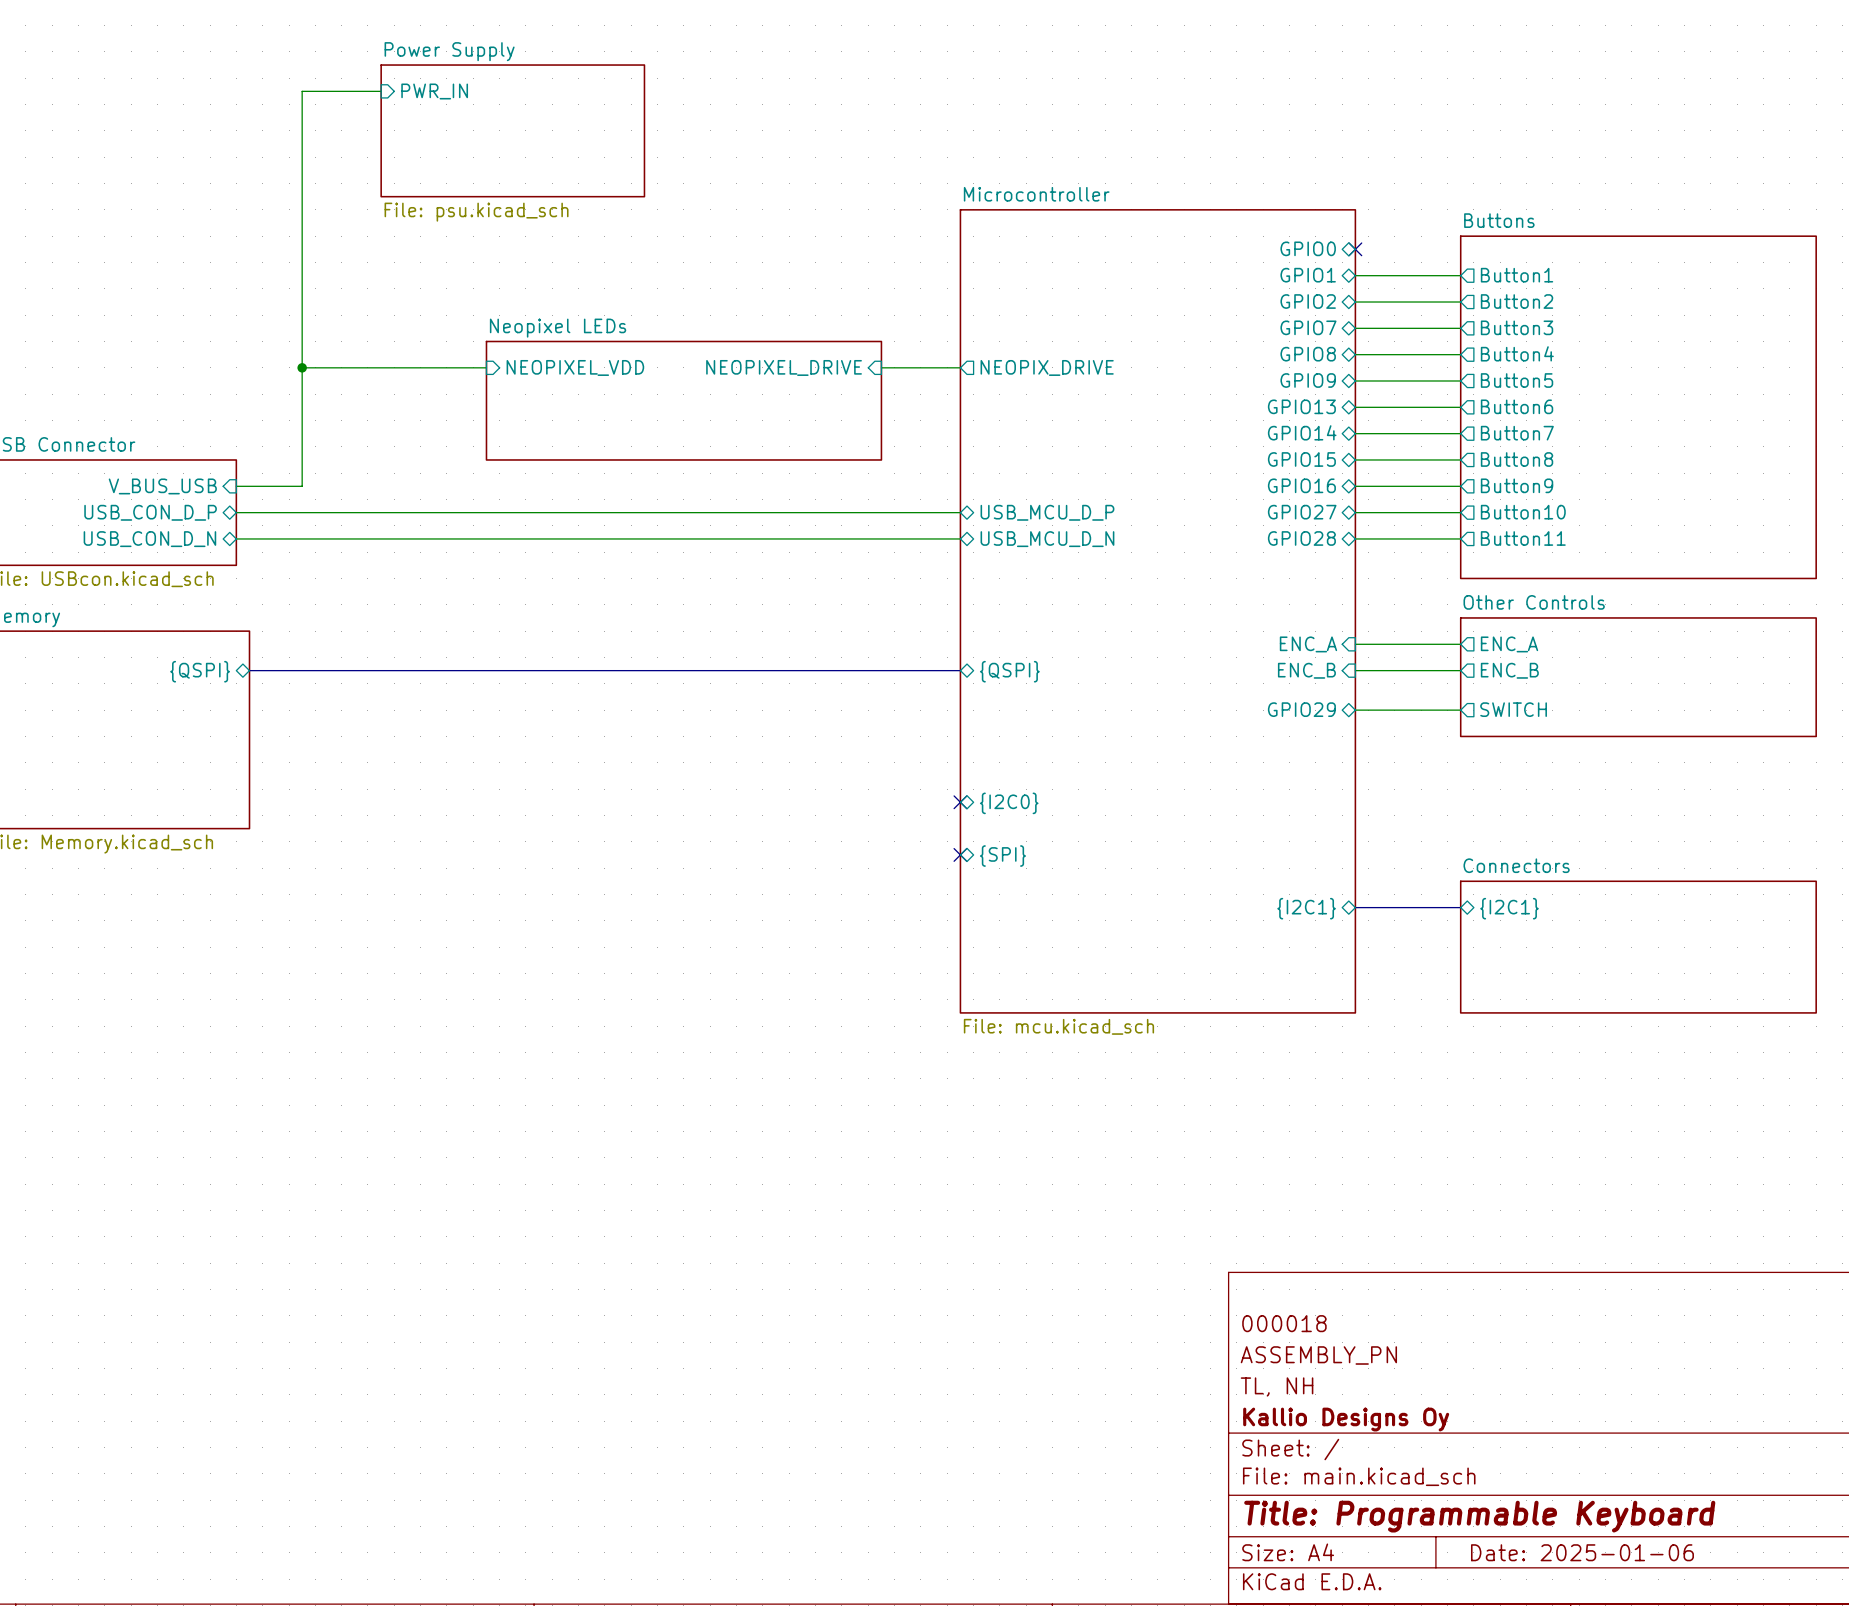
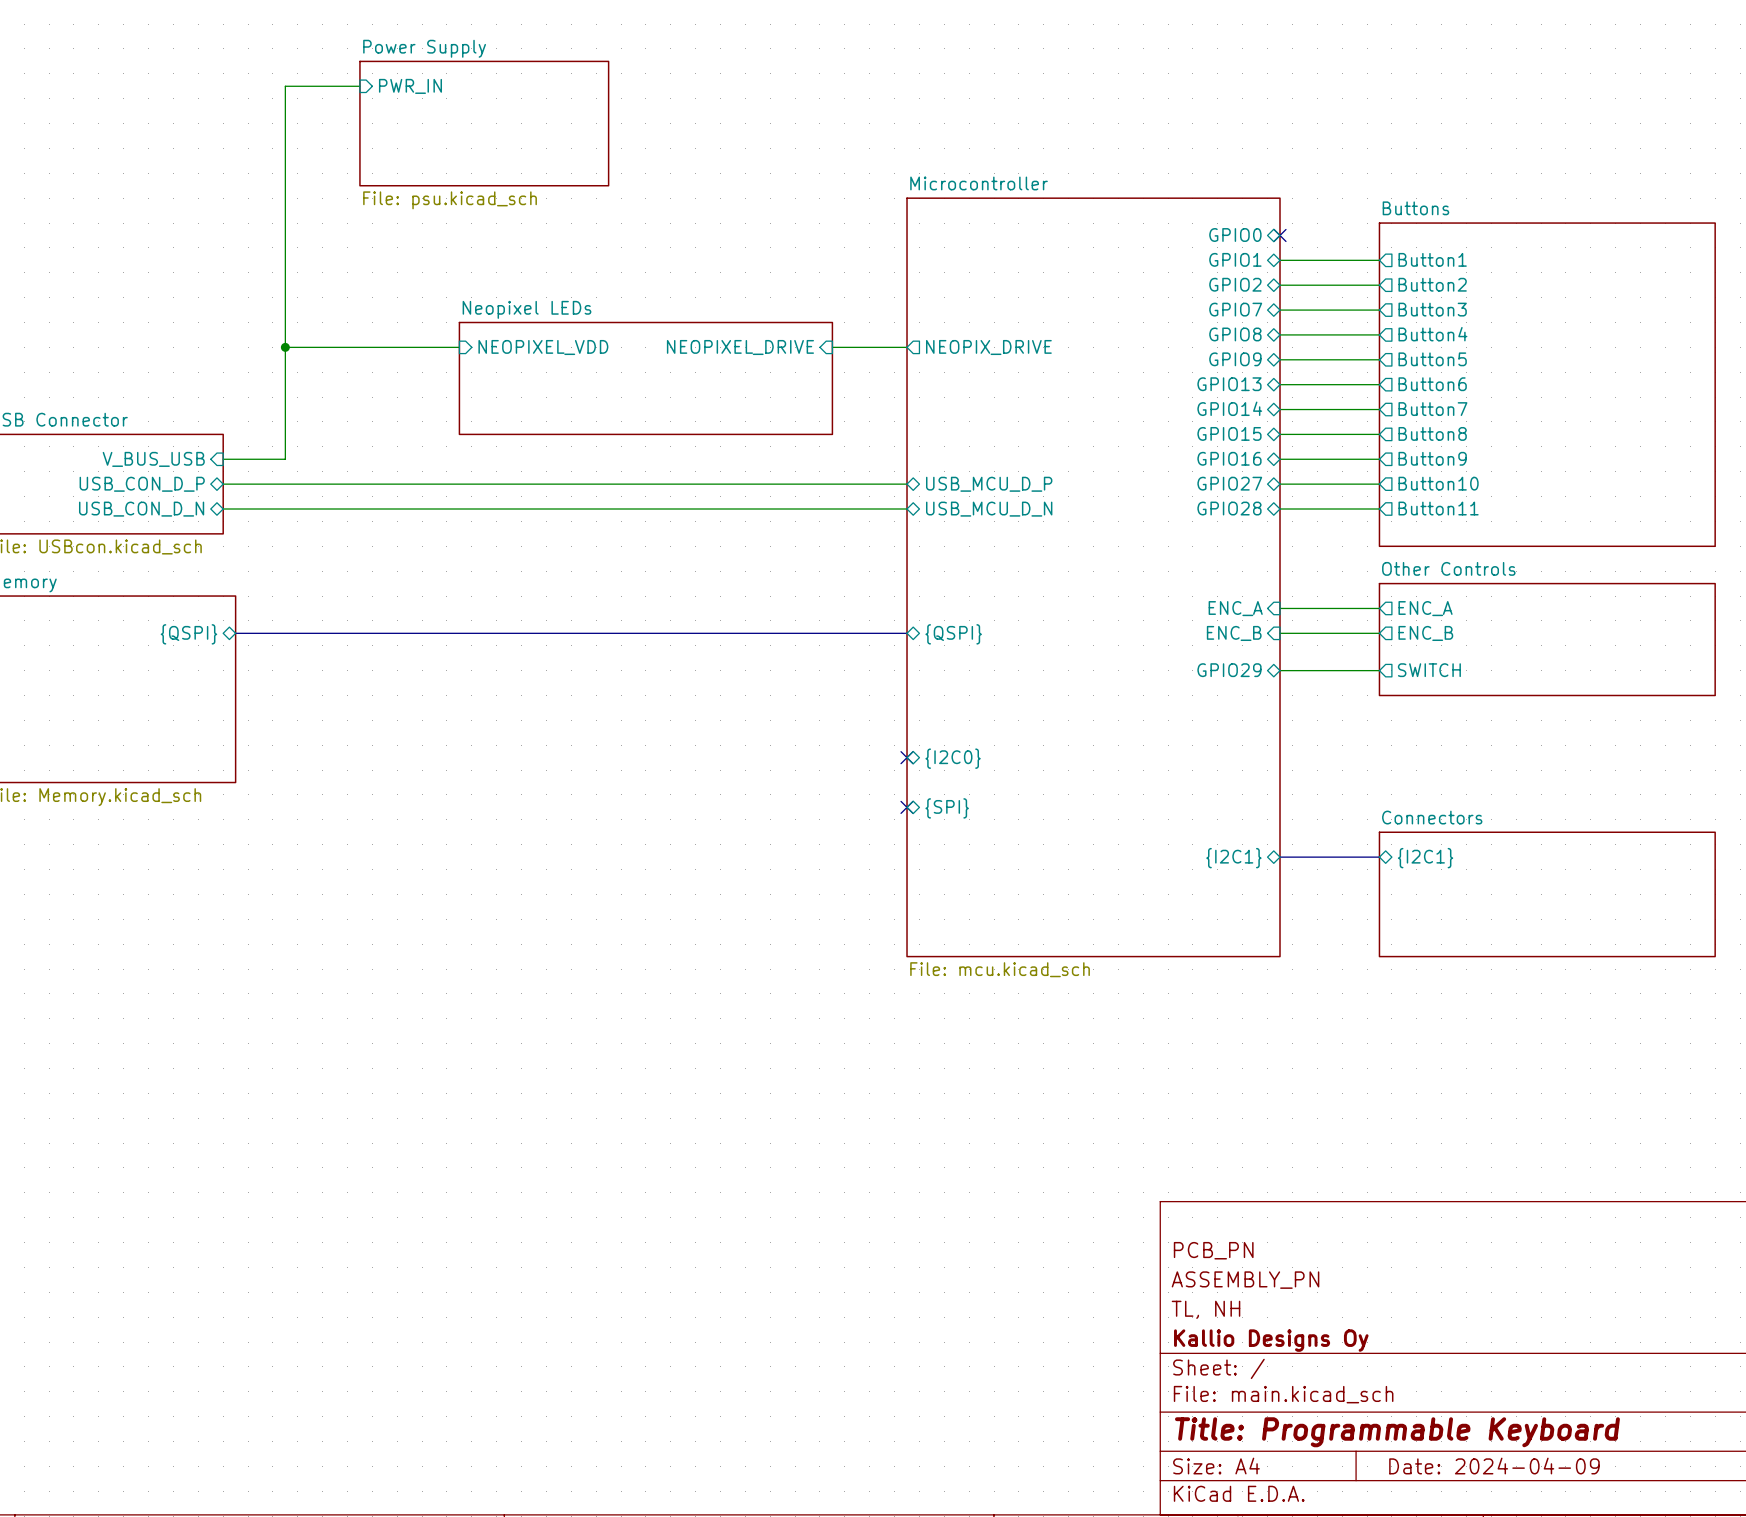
title block: 000018 (1284, 1323) -> PCB_PN (1213, 1250)
title block: Date: 2025-01-06 (1582, 1552) -> Date: 2024-04-09 (1494, 1466)

